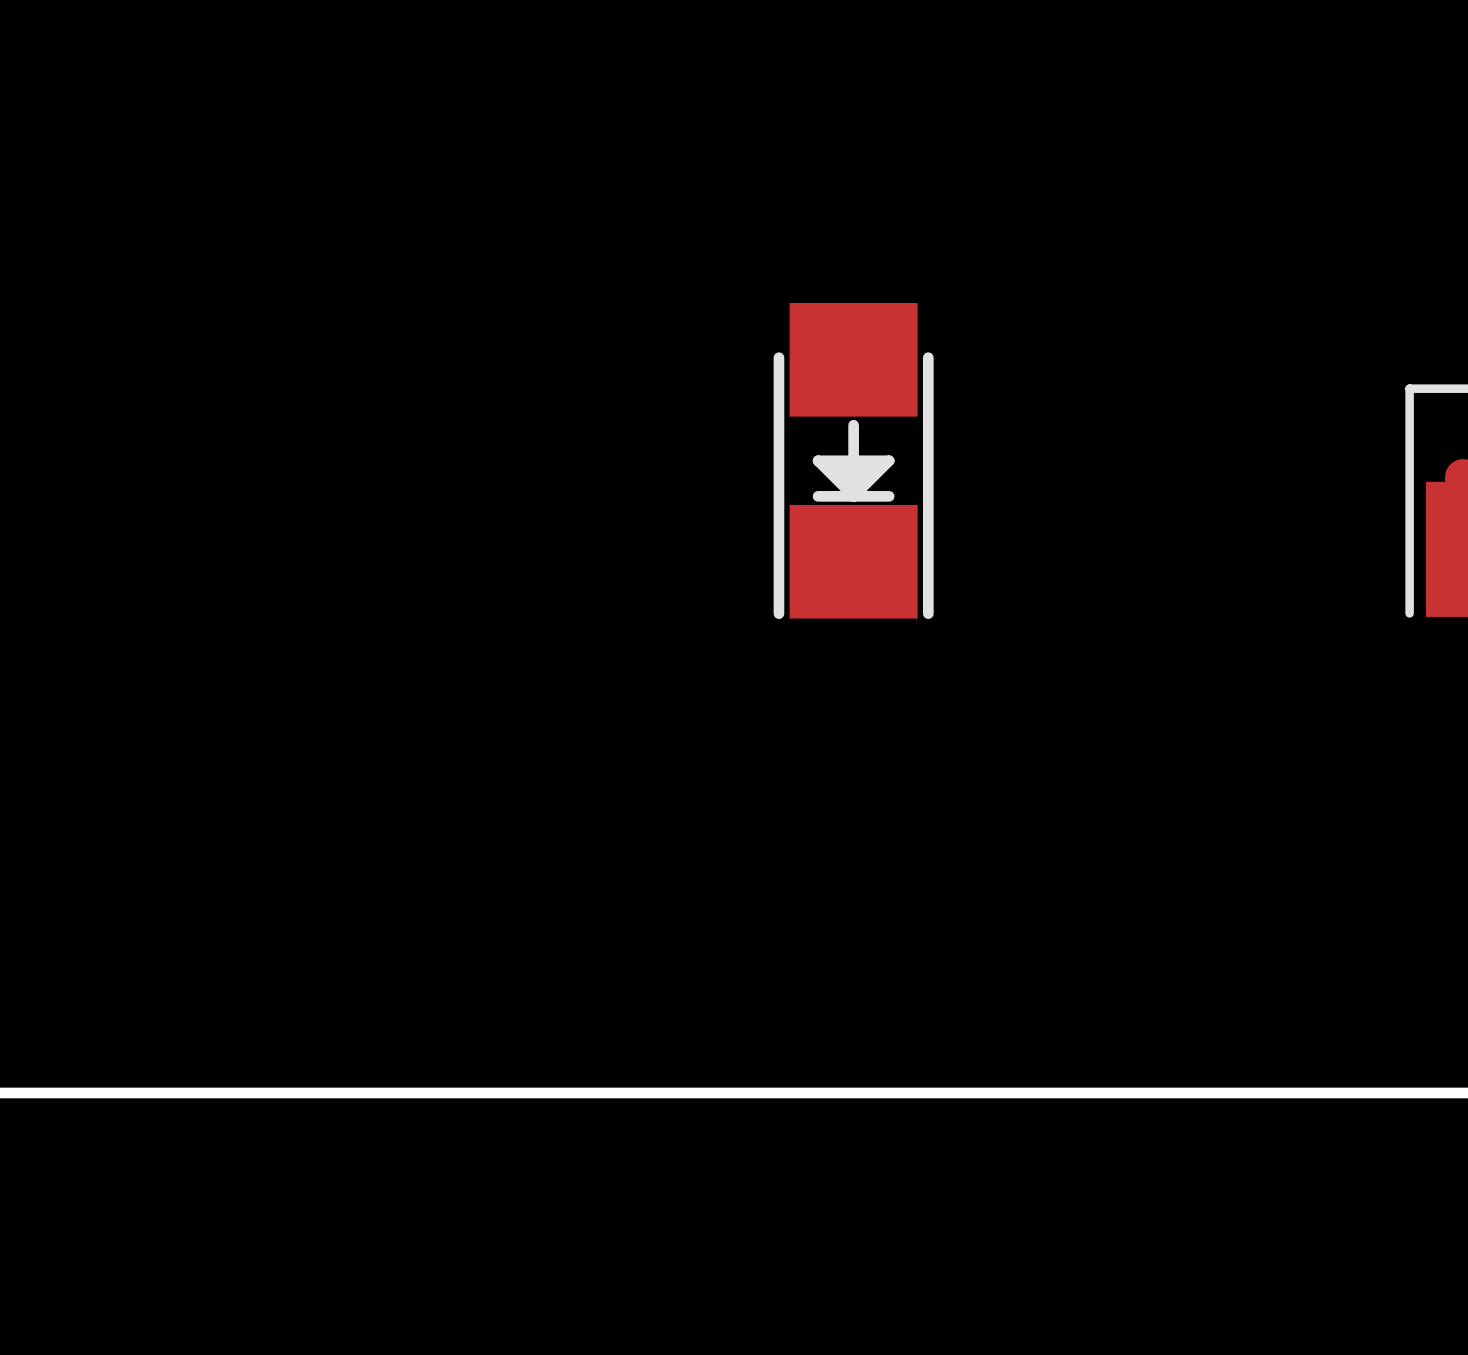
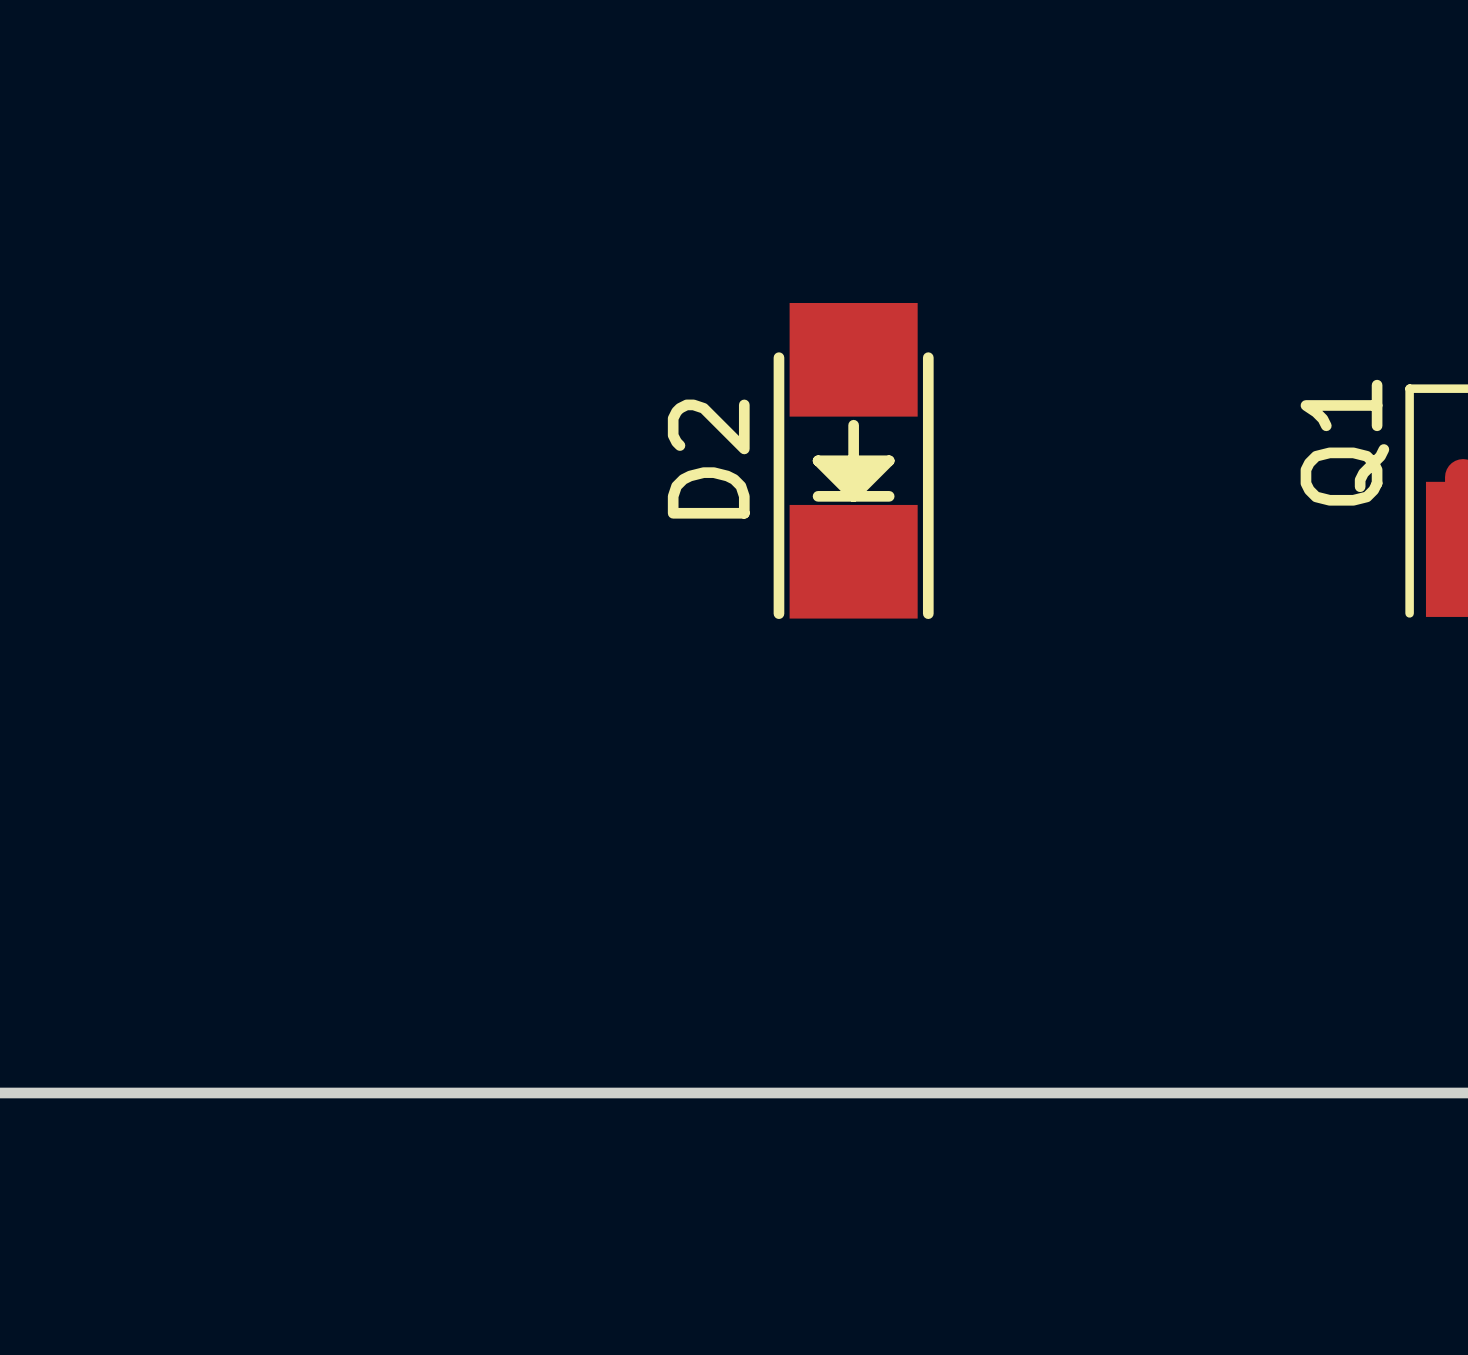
Q1 name: none -> Q1 (1344, 442)
D2 name: none -> D2 (708, 459)

